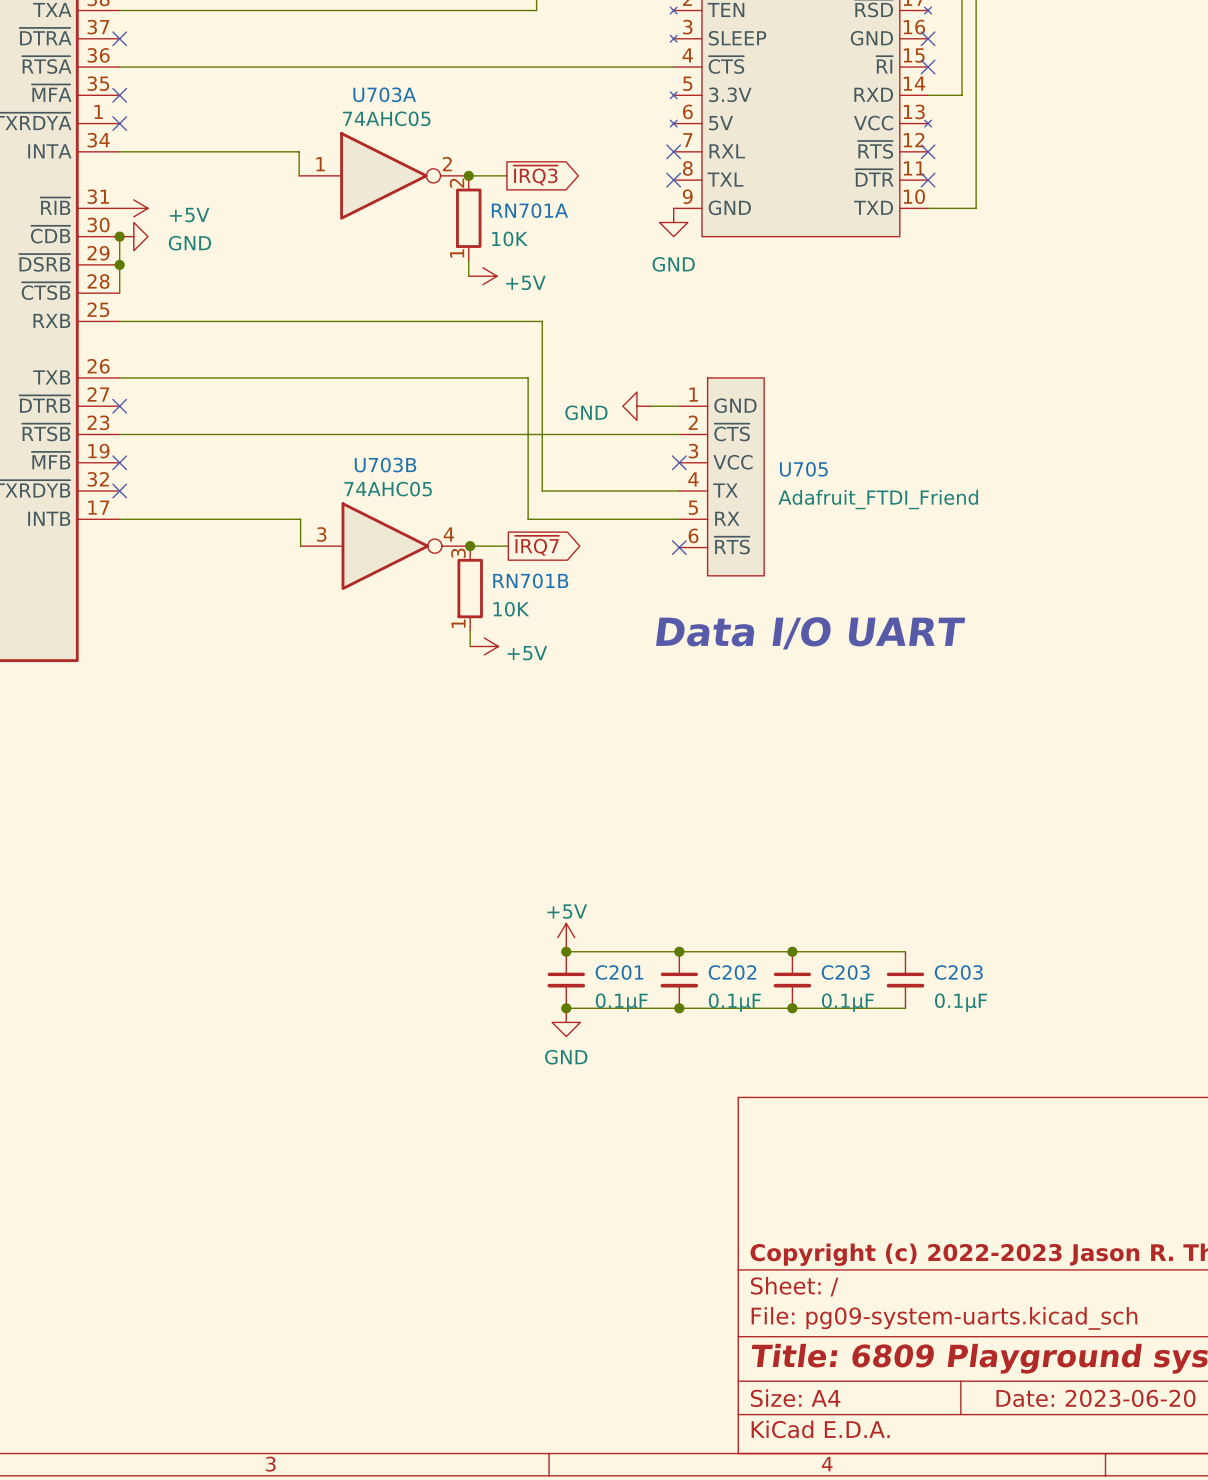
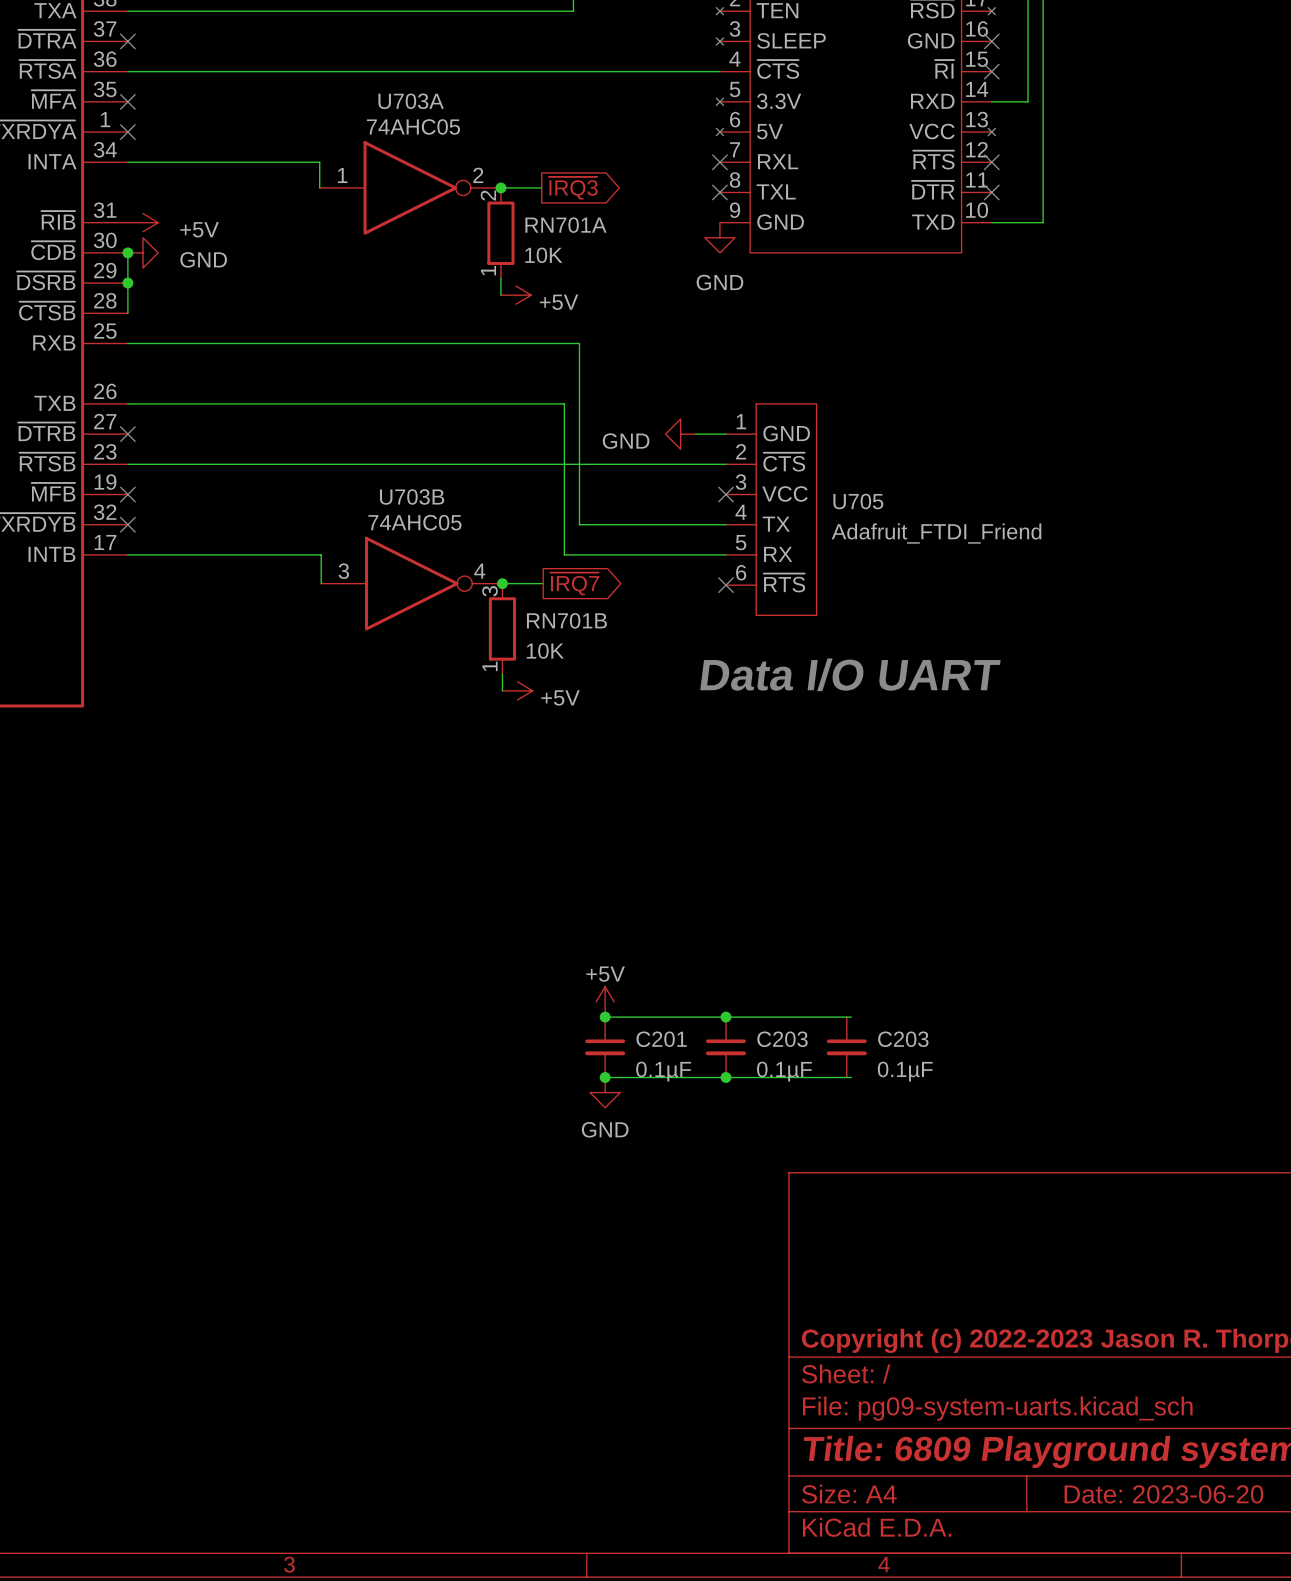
junction: (792, 951) -> none
wire: (796, 951) (905, 951) -> none
C202 name: C202 (732, 972) -> C203 (782, 1039)
C203: 0.1µF (905, 980) -> none
junction: (792, 1008) -> none
wire: (796, 1008) (905, 1008) -> none

